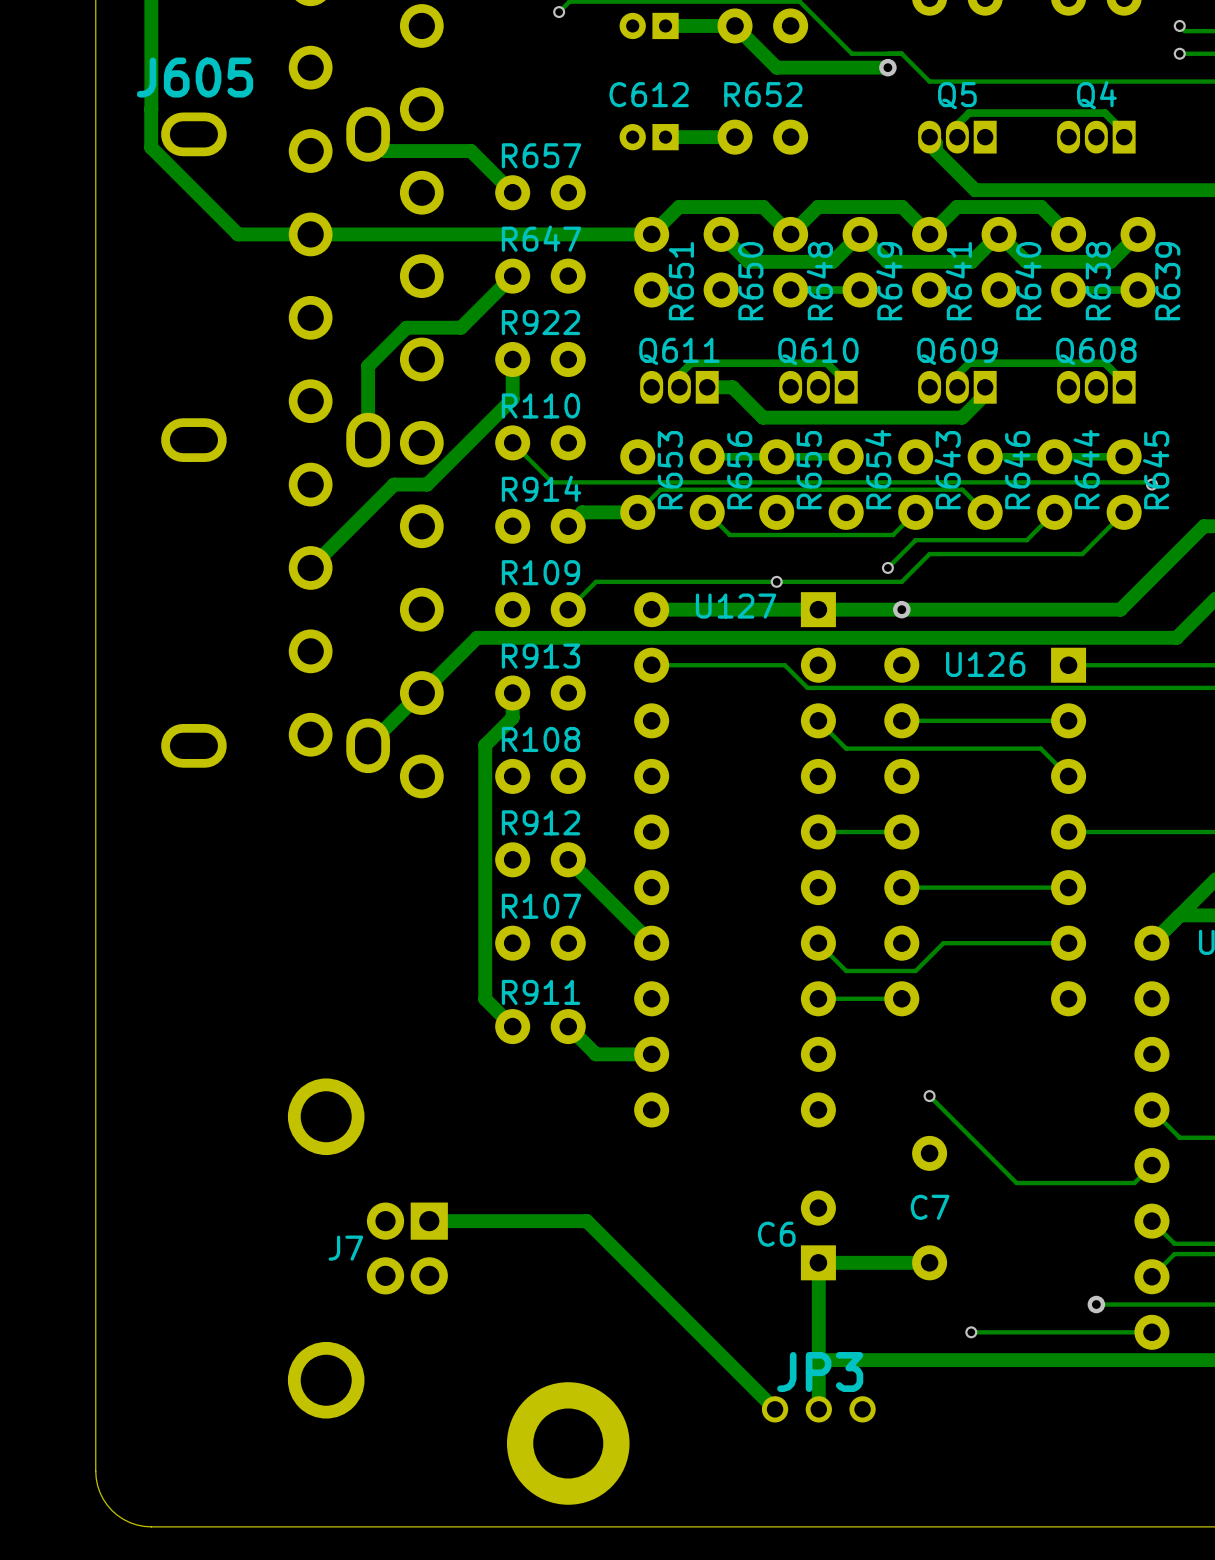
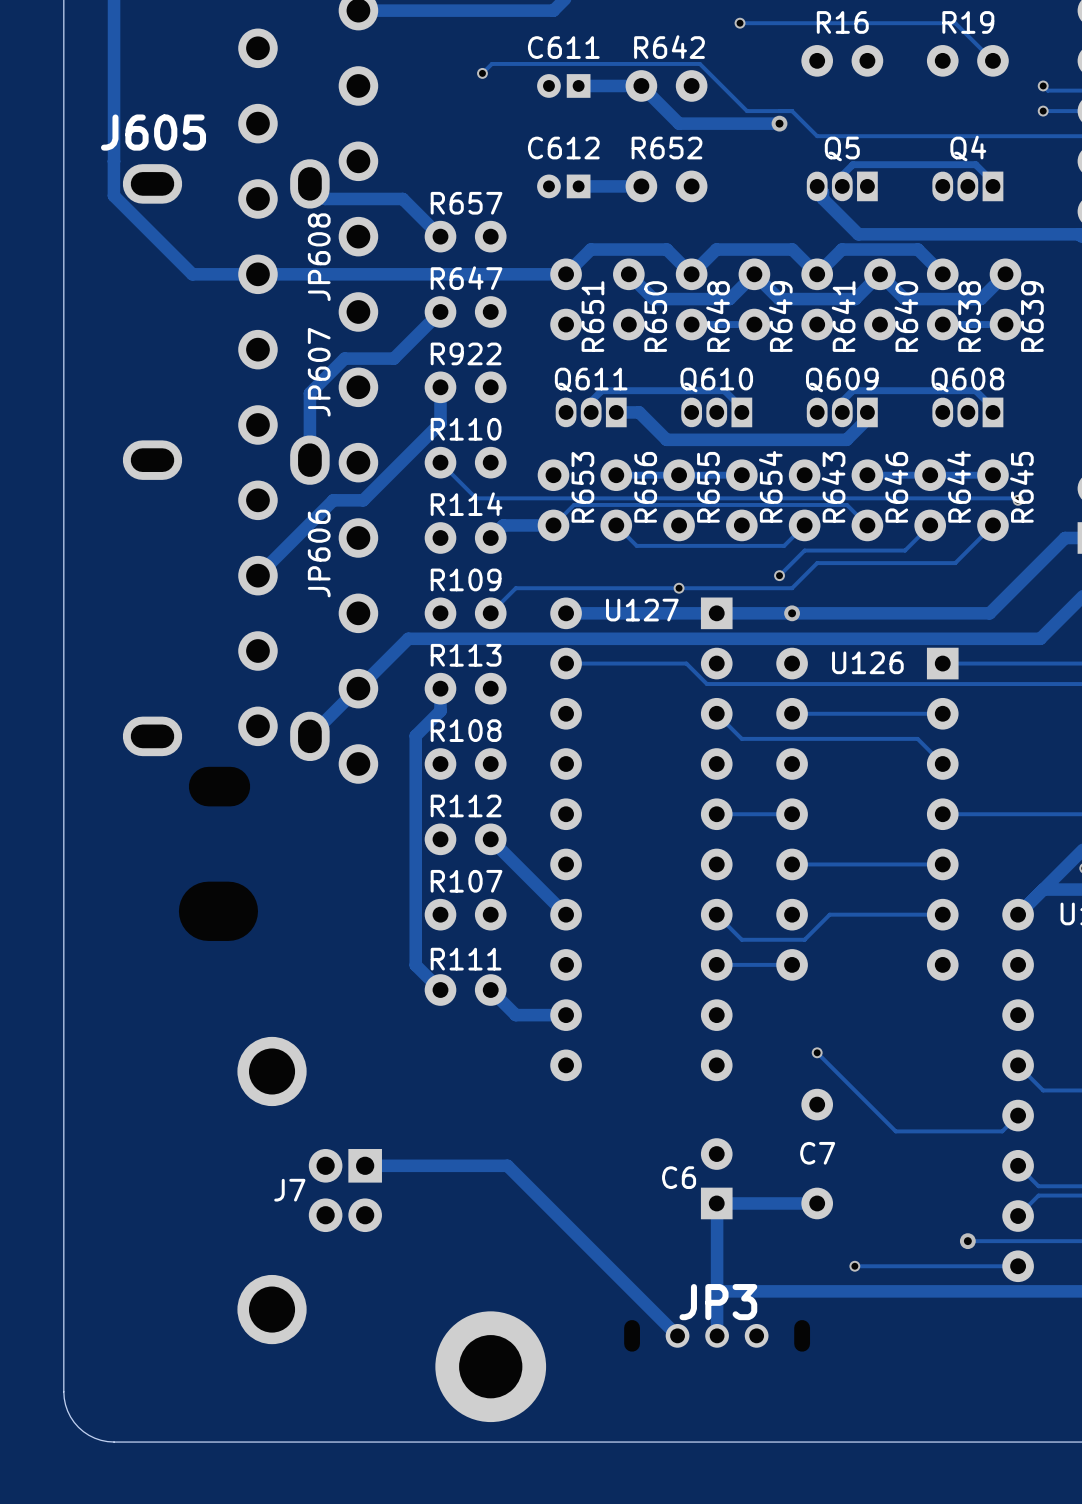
JP608: none -> (319, 257)
JP607: none -> (319, 372)
R914 name: R914 (541, 488) -> R114 (466, 504)
JP606: none -> (319, 553)
R913 name: R913 (540, 656) -> R113 (466, 655)
R912 name: R912 (540, 822) -> R112 (466, 805)
R911 name: R911 (540, 992) -> R111 (466, 959)

